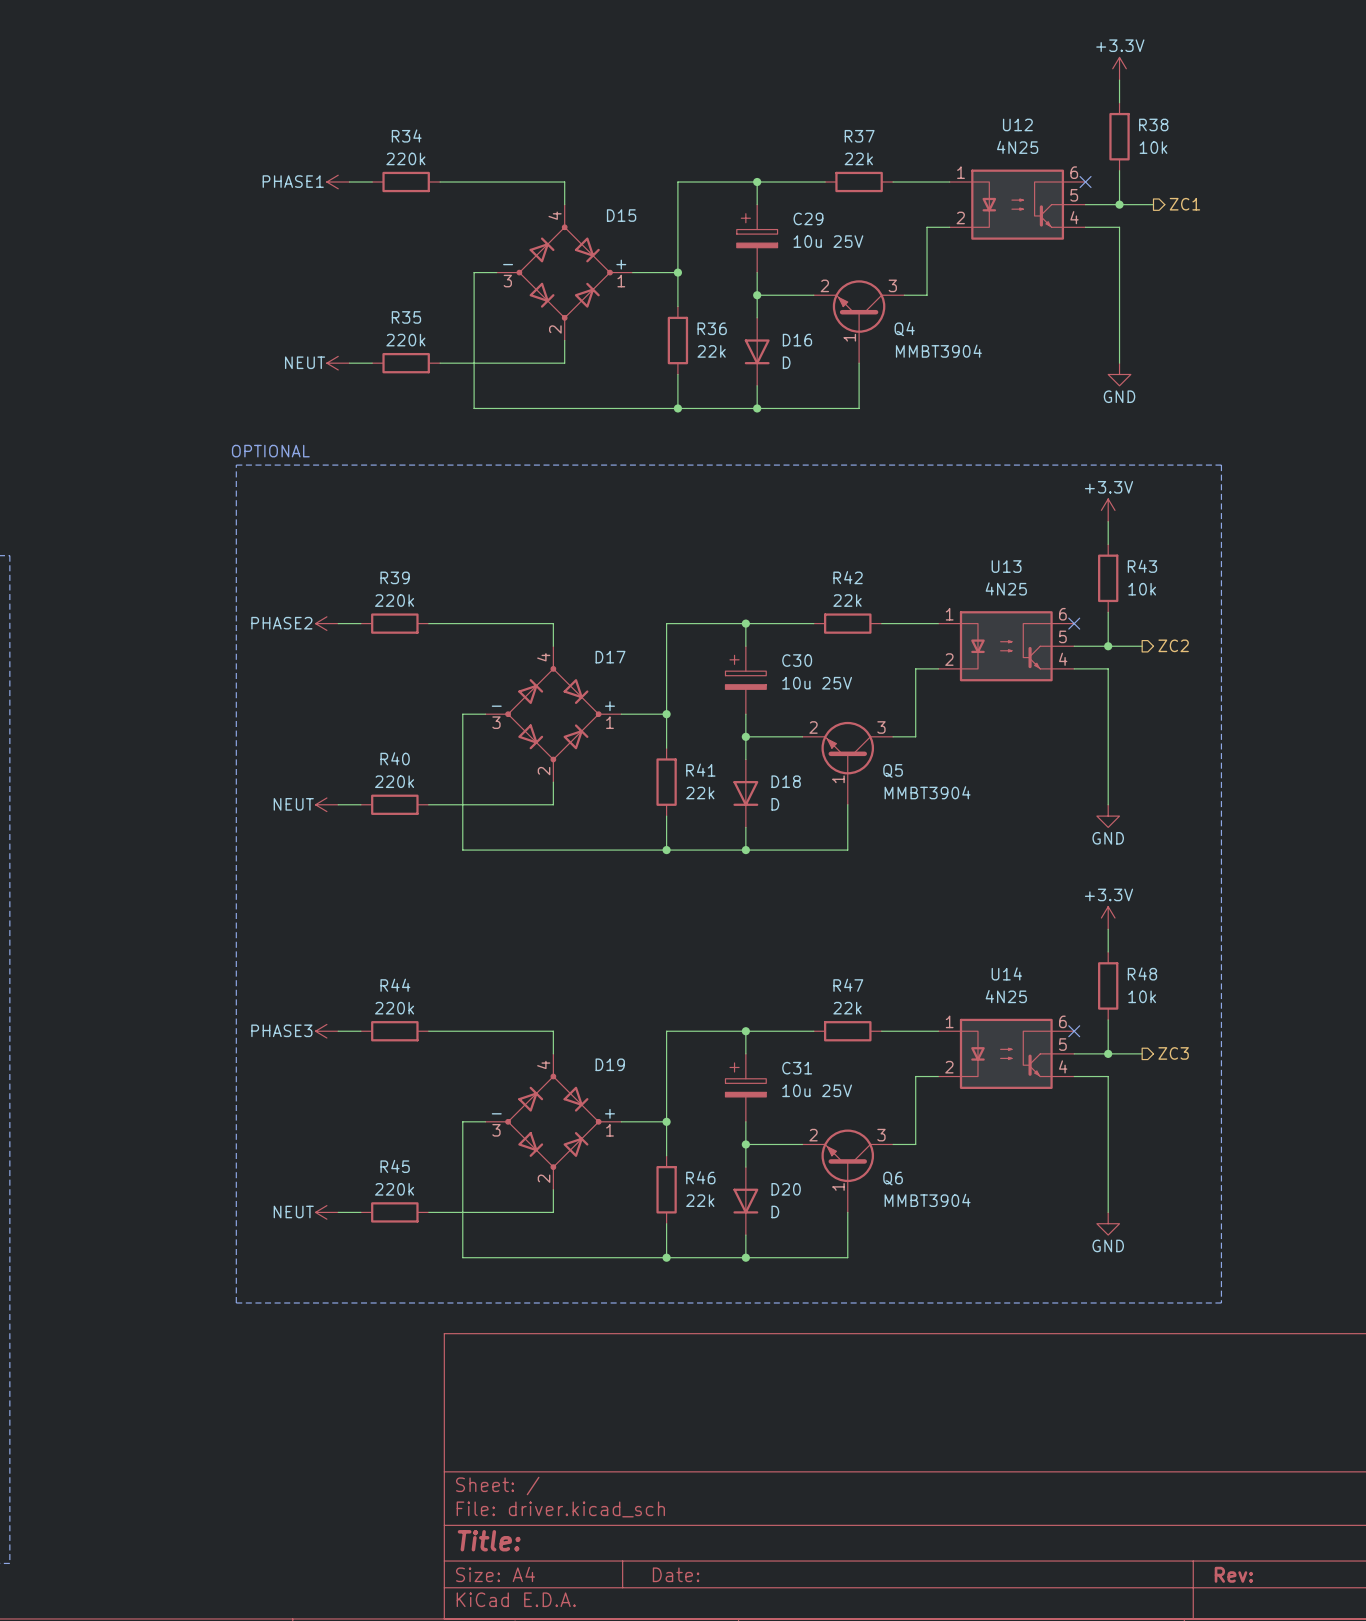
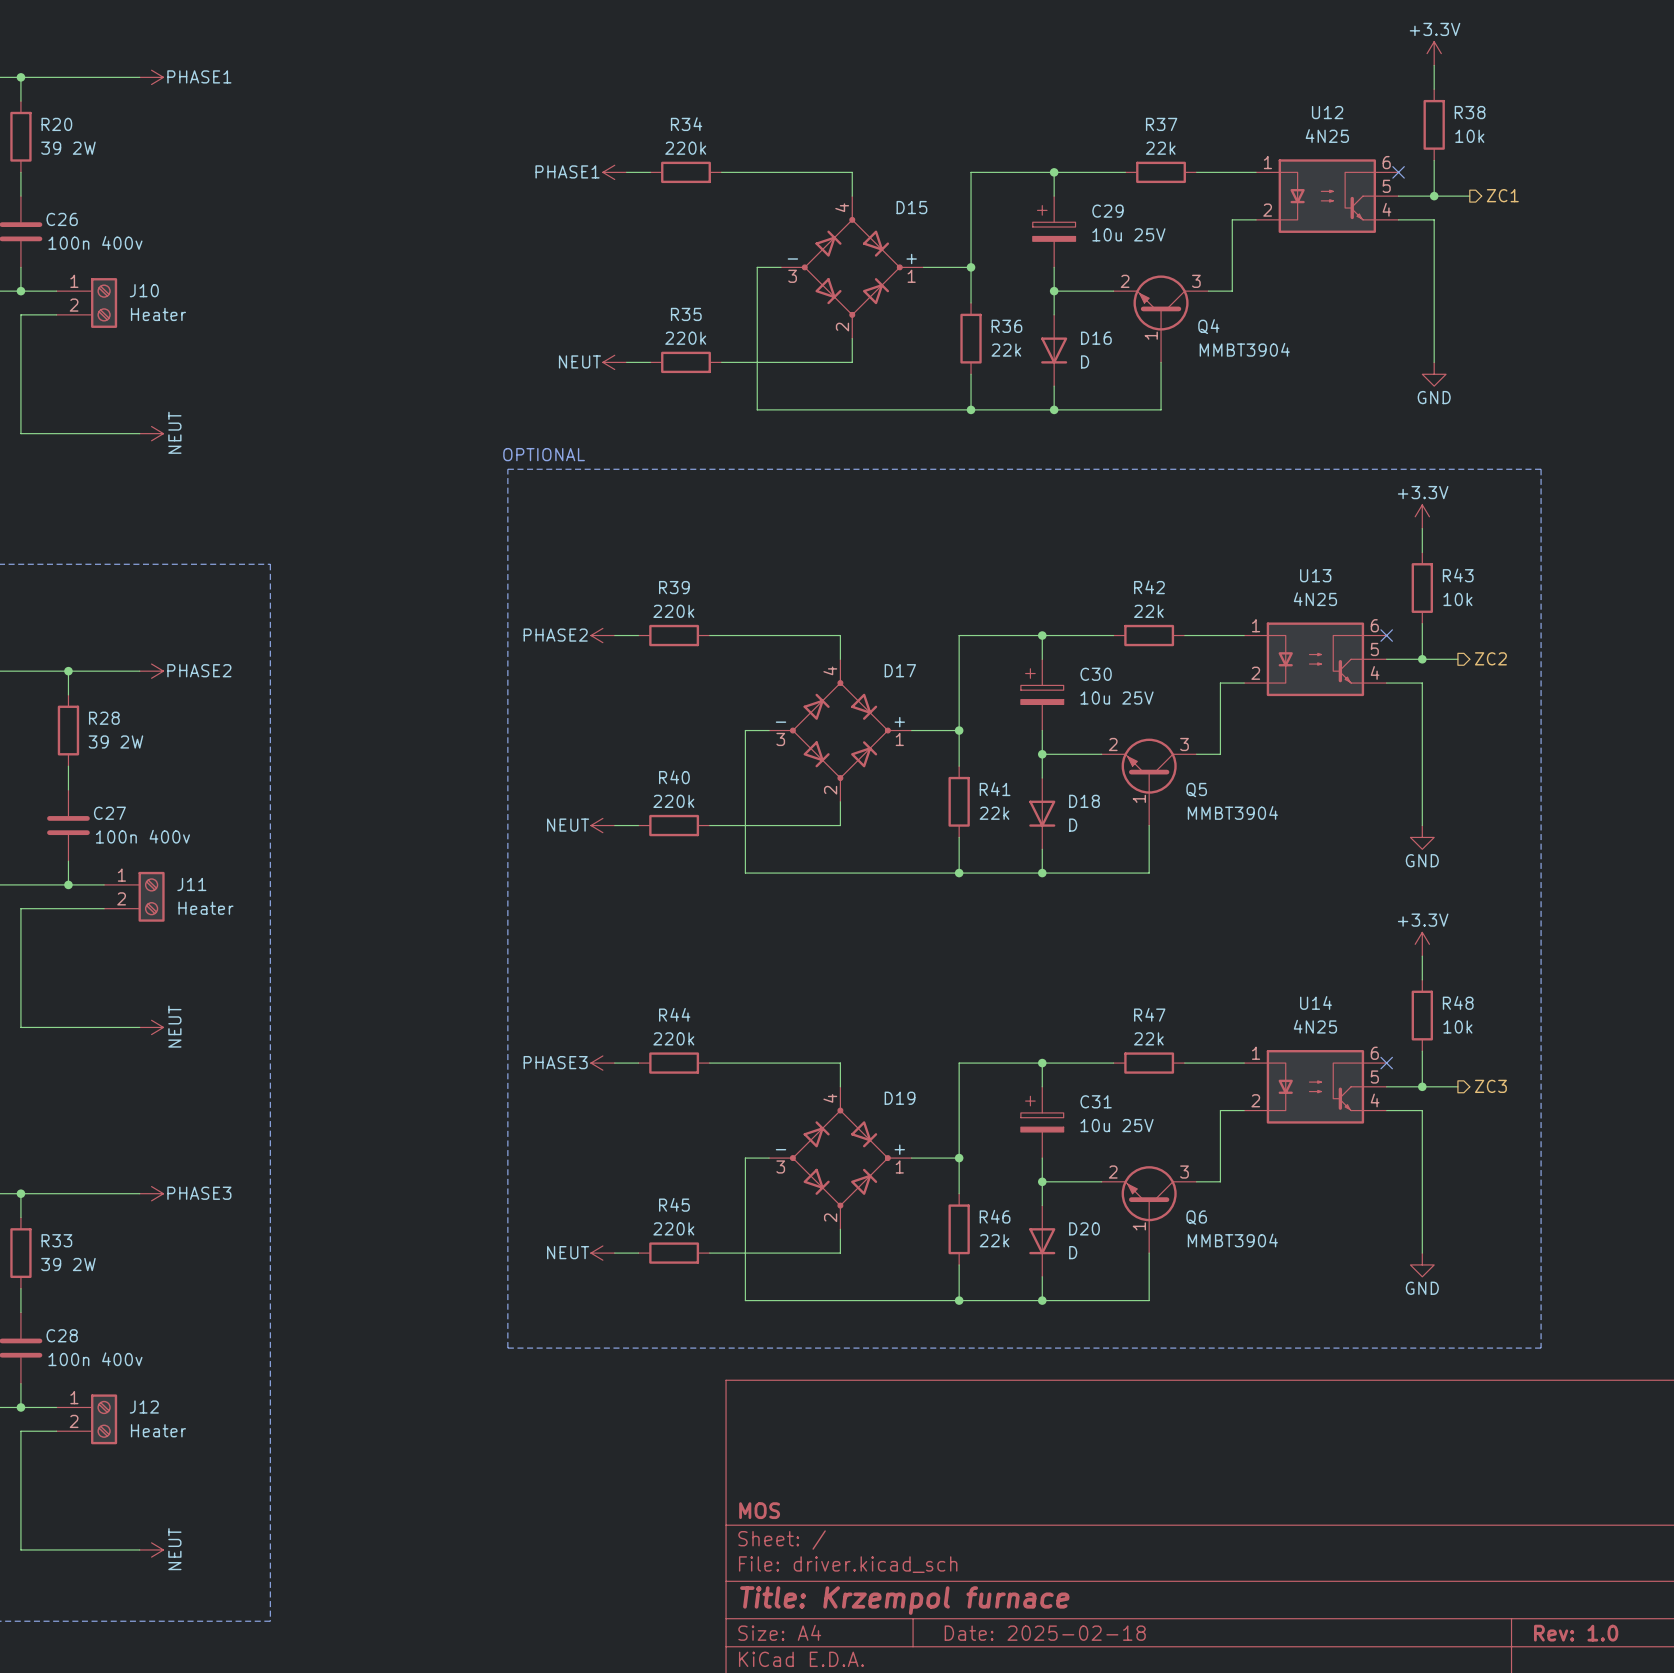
title block: none -> MOS (759, 1510)
title block: Title: (489, 1540) -> Title: Krzempol furnace (904, 1600)
title block: Date: (676, 1574) -> Date: 2025-02-18 (1045, 1633)
title block: Rev: (1233, 1574) -> Rev: 1.0 (1576, 1633)

